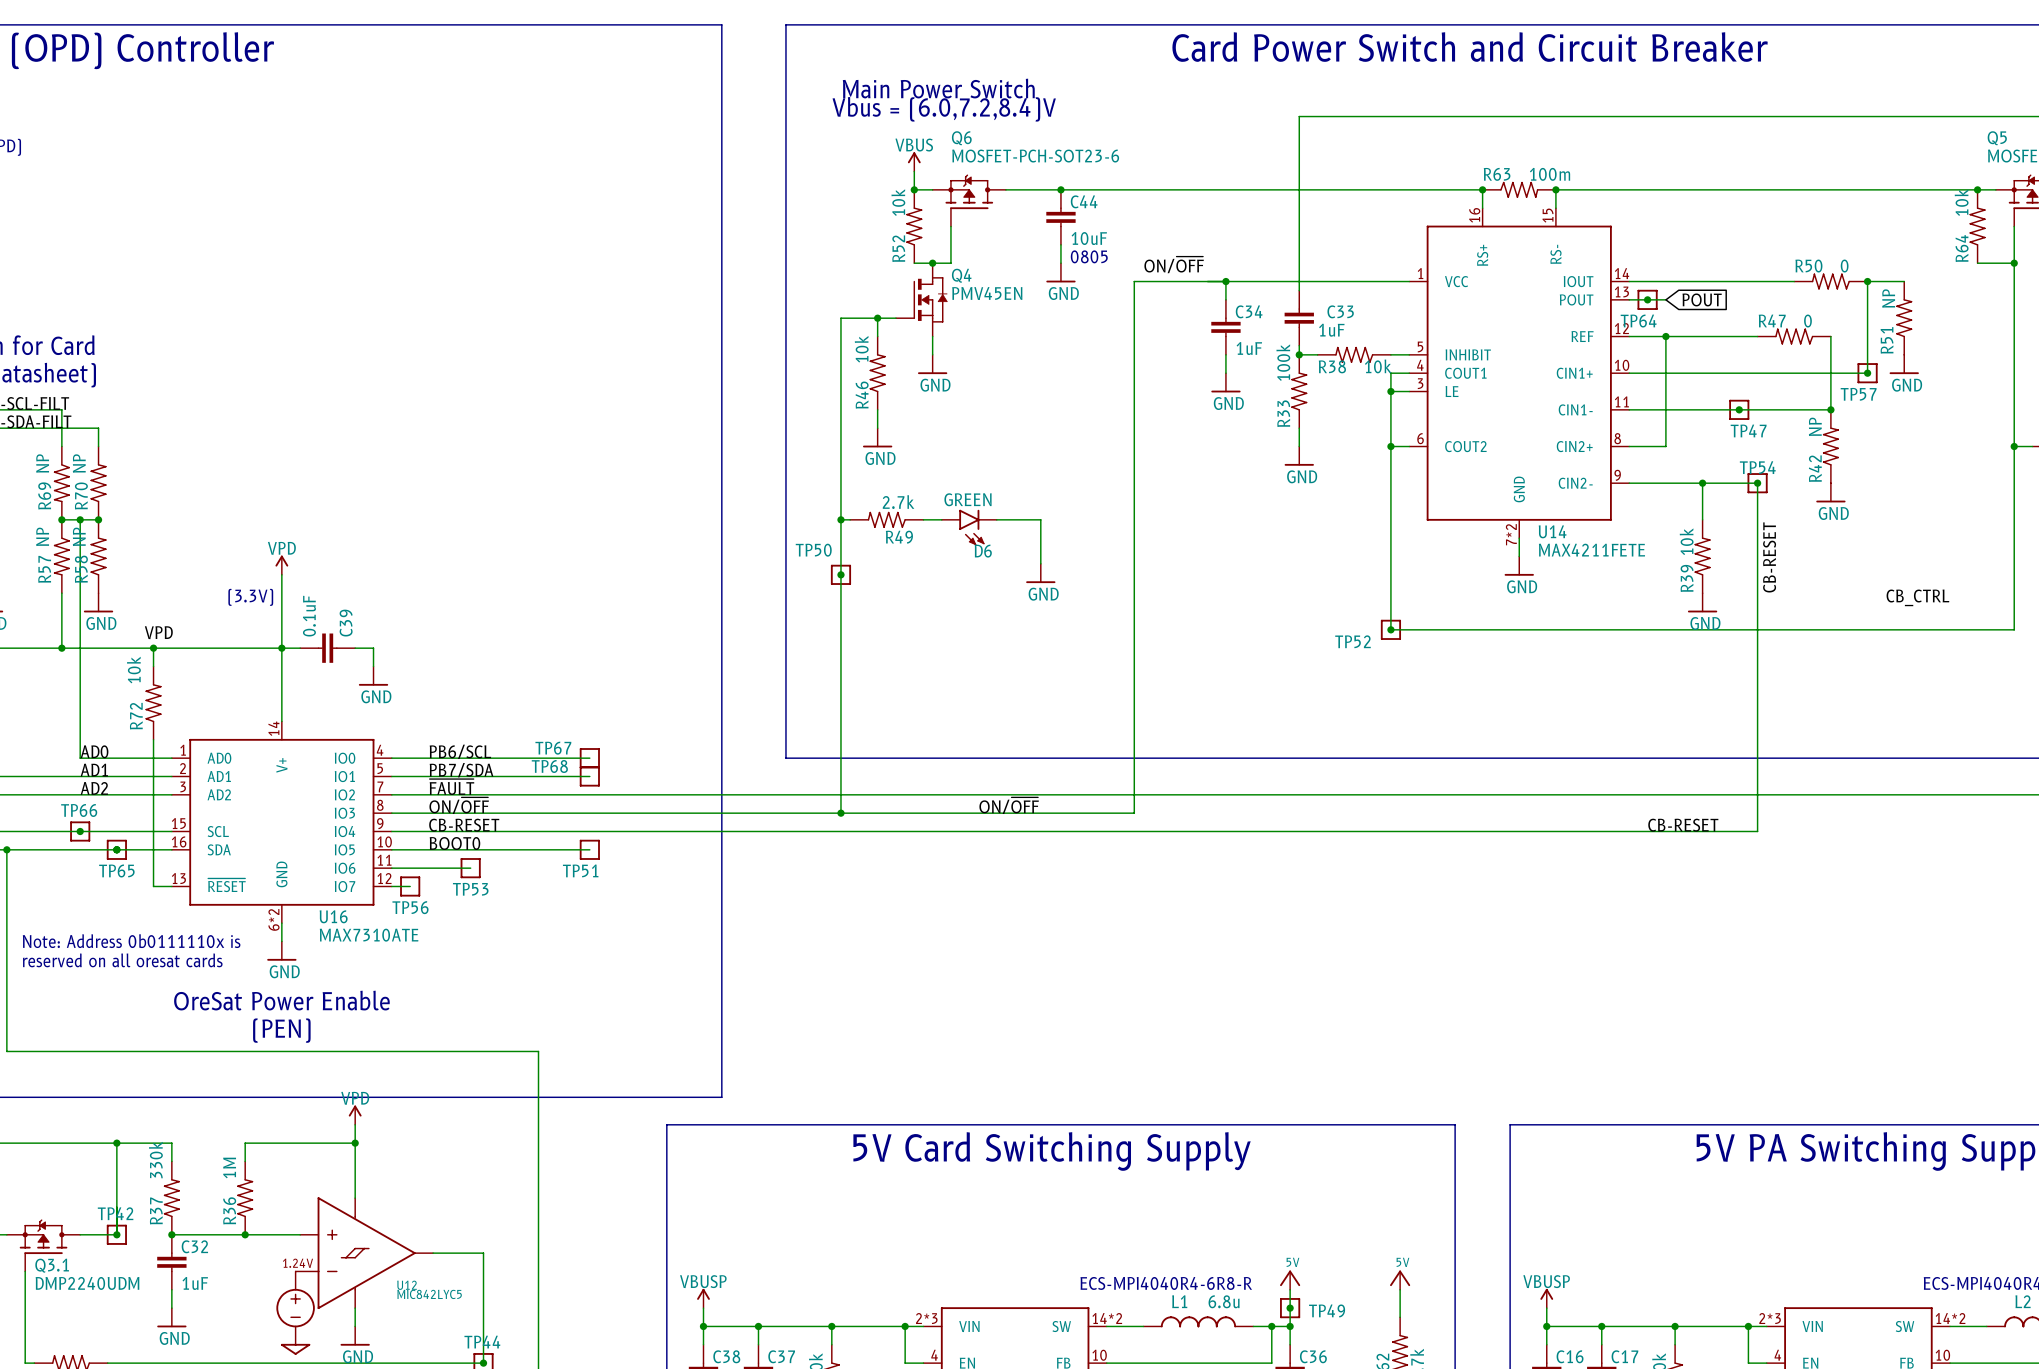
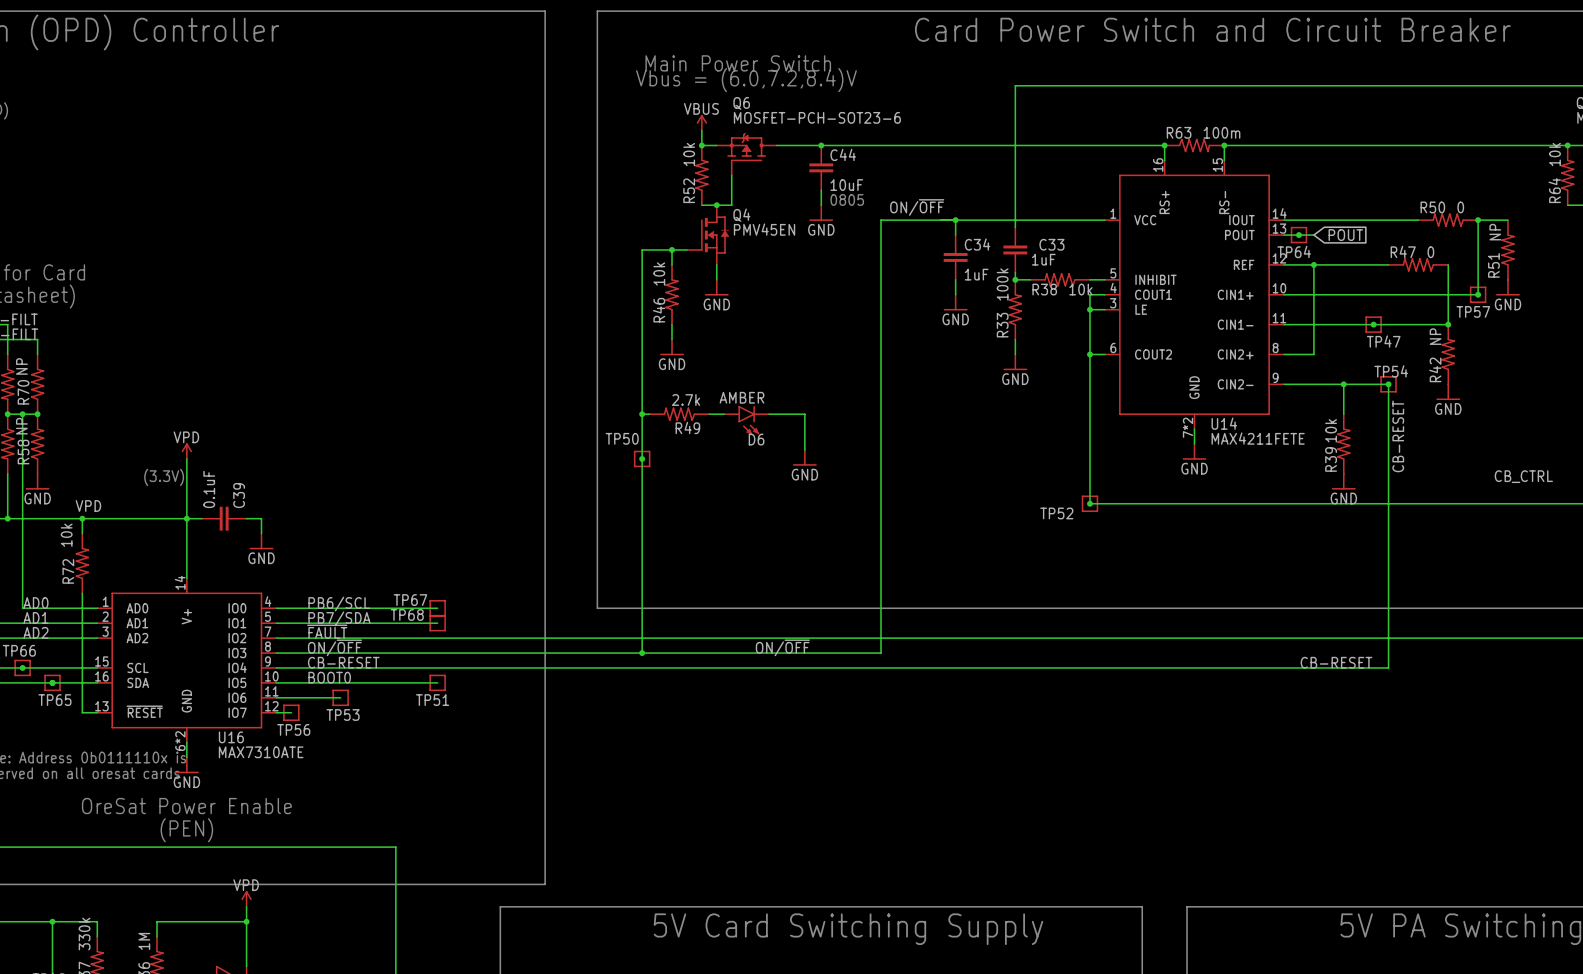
D6 value: GREEN (968, 499) -> AMBER (741, 397)

